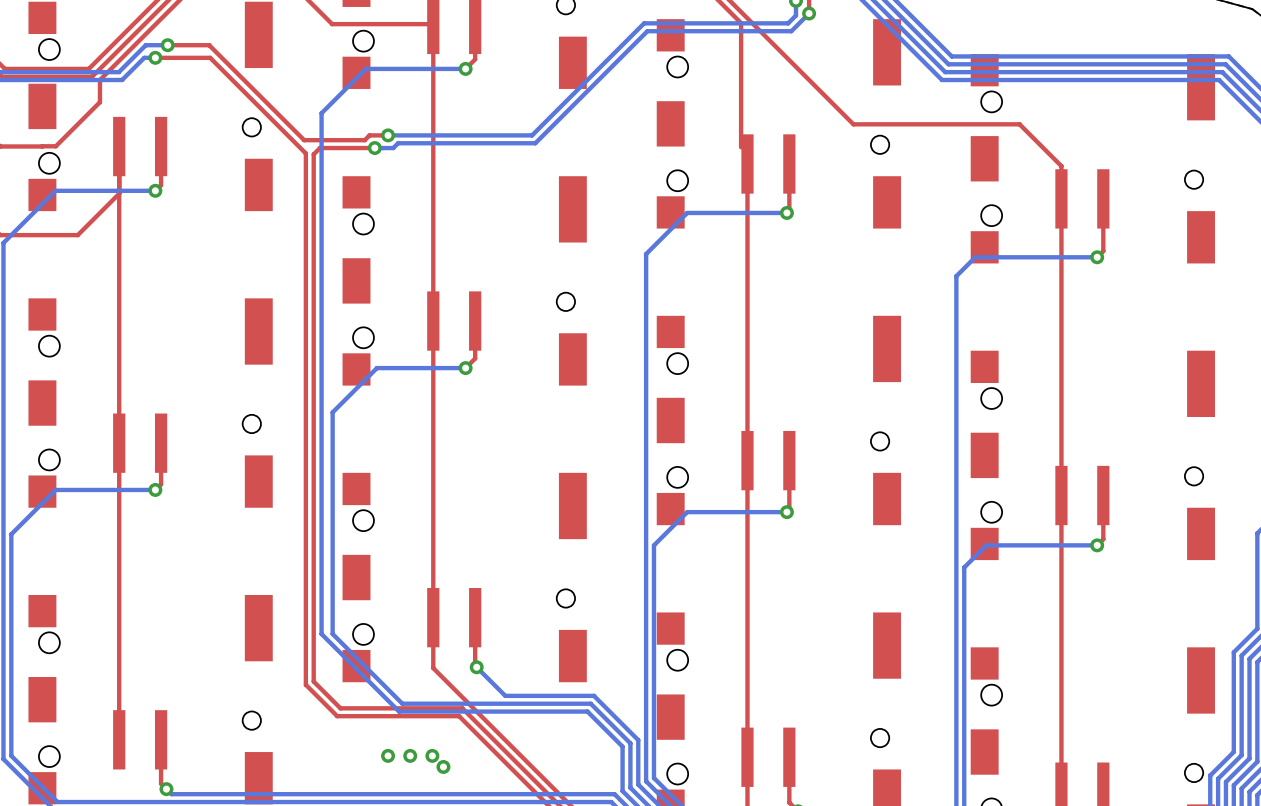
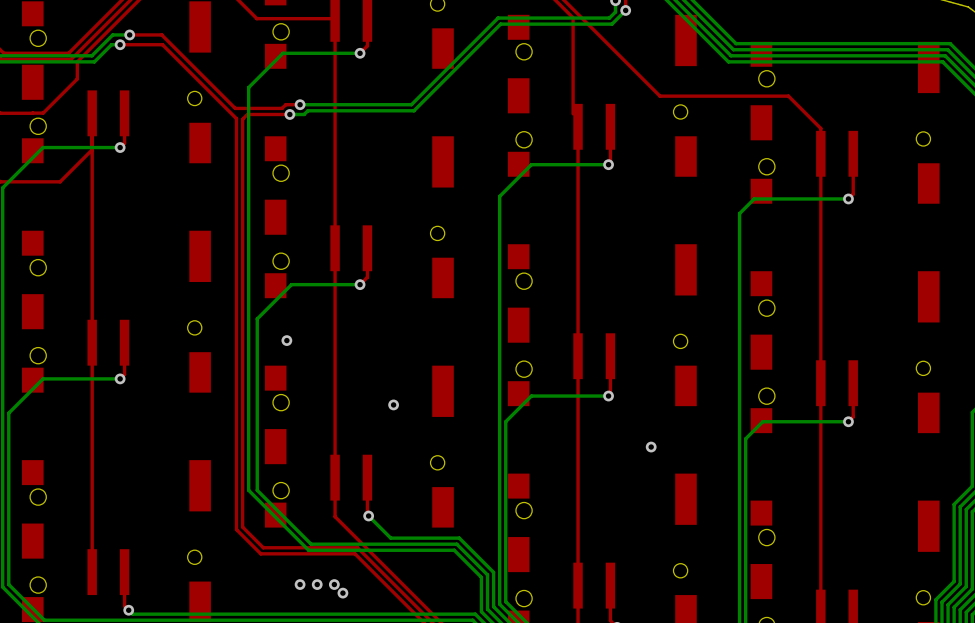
via: none -> (286, 340)
via: none -> (393, 404)
via: none -> (651, 447)

